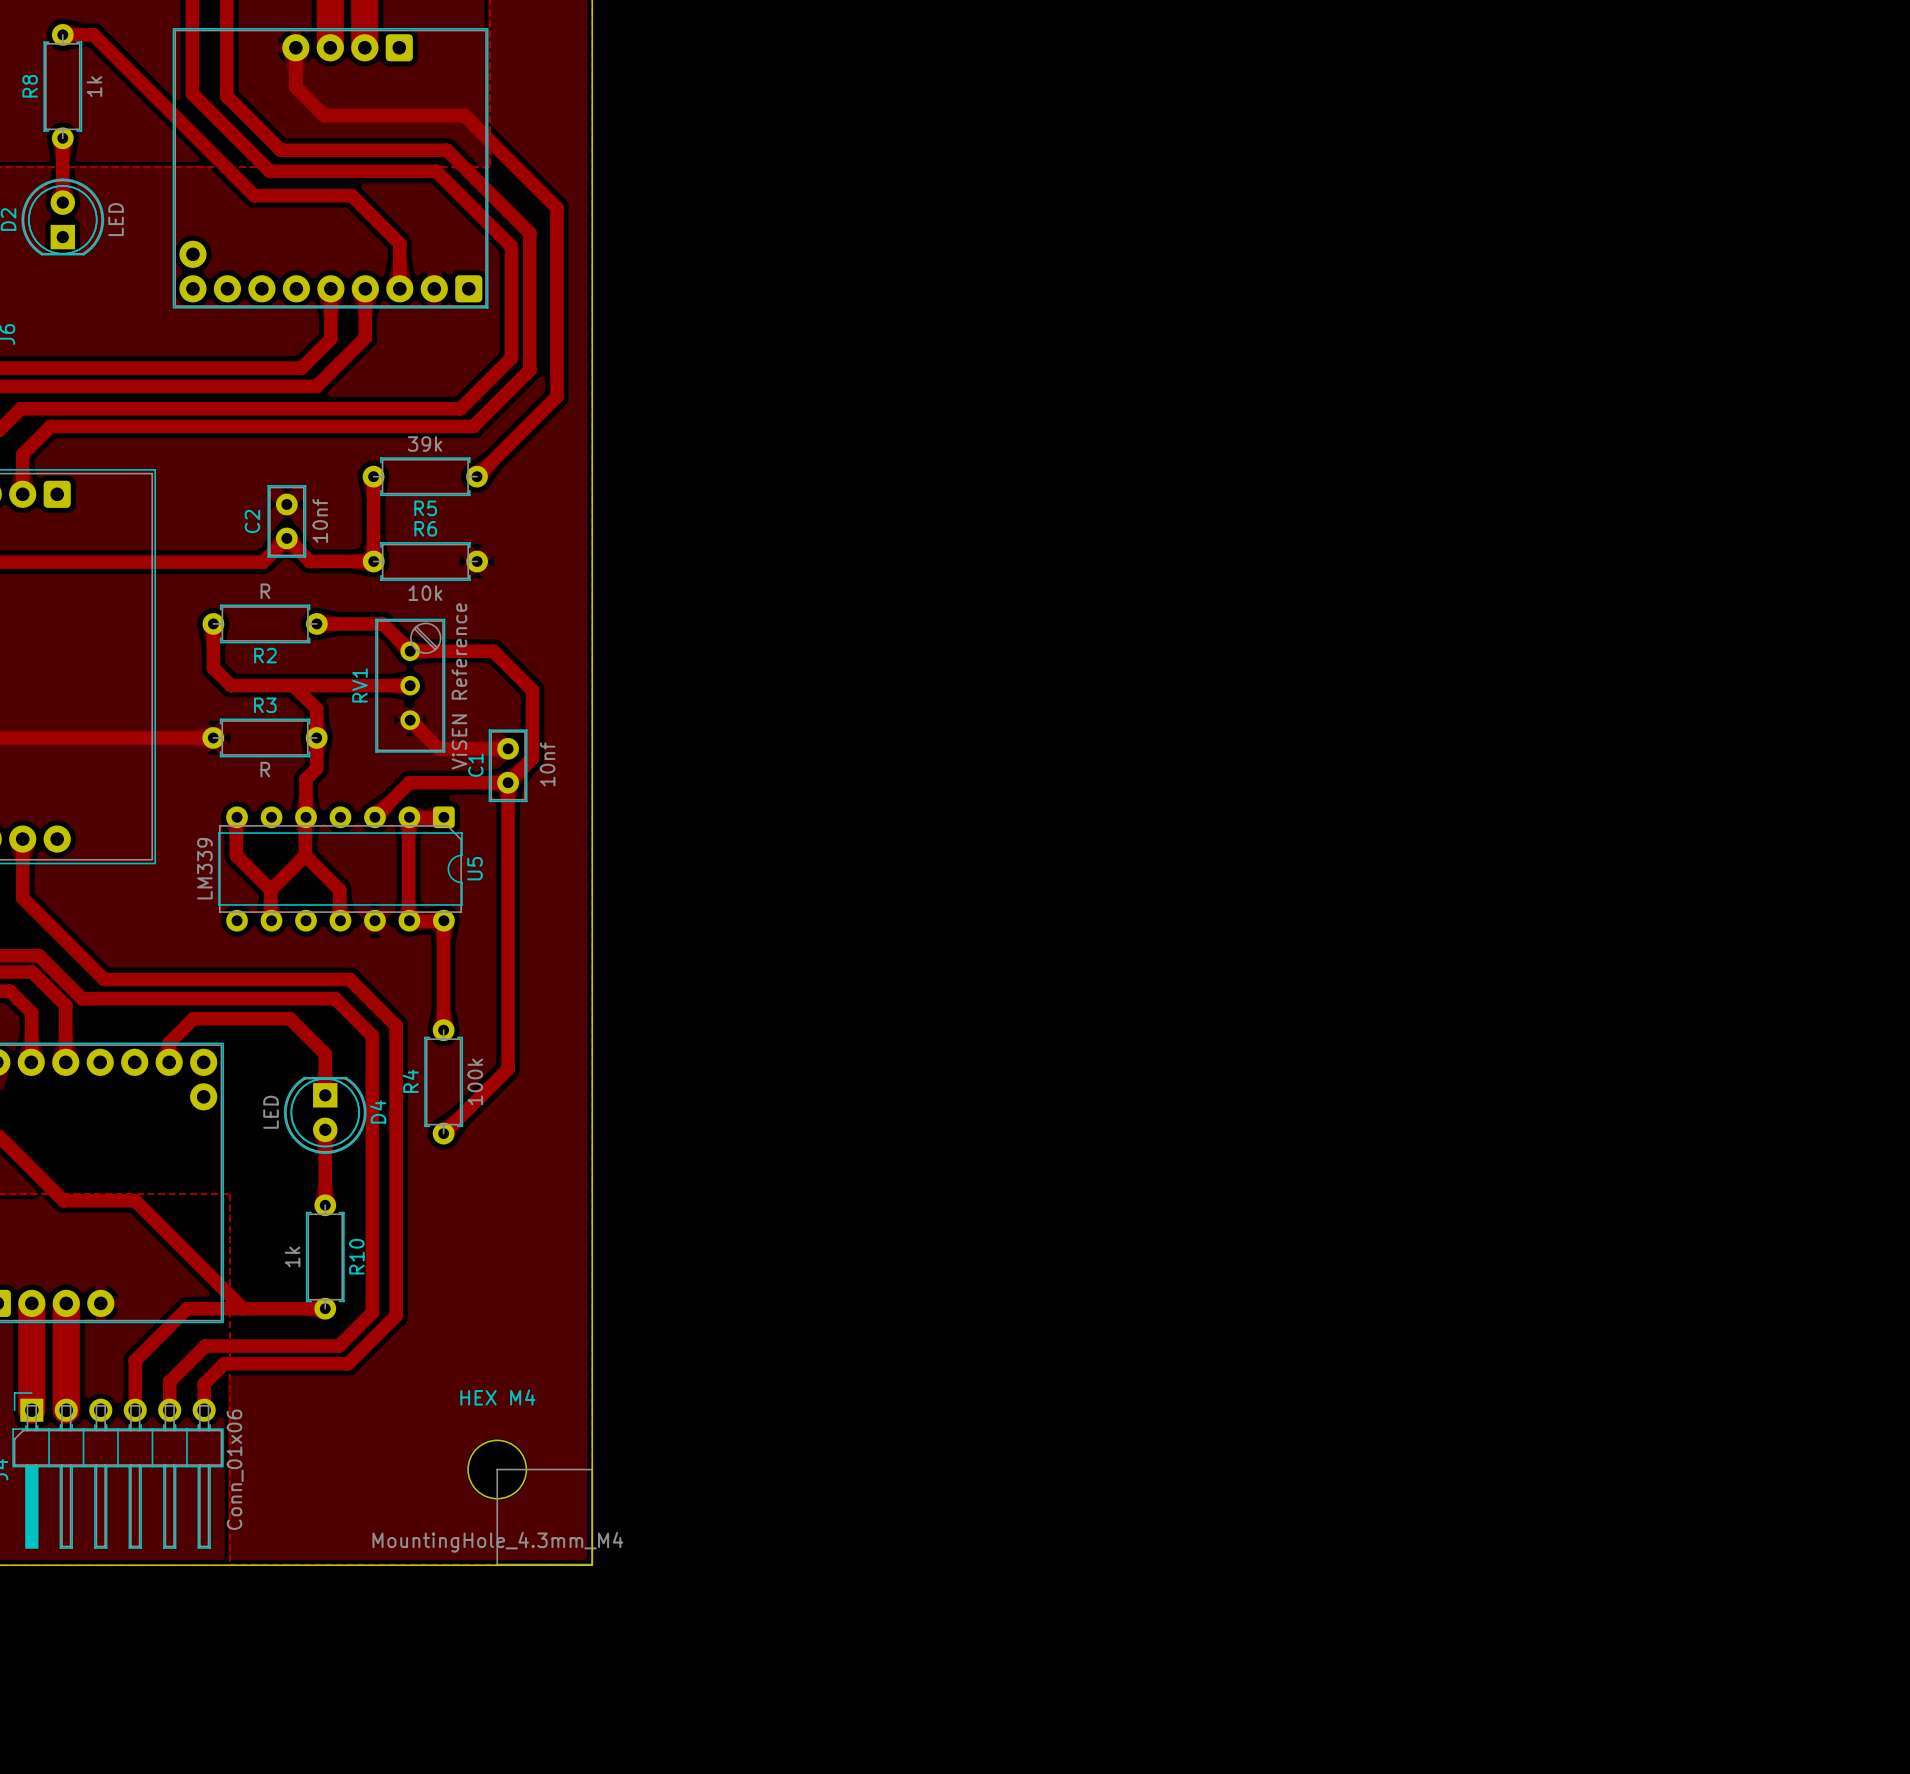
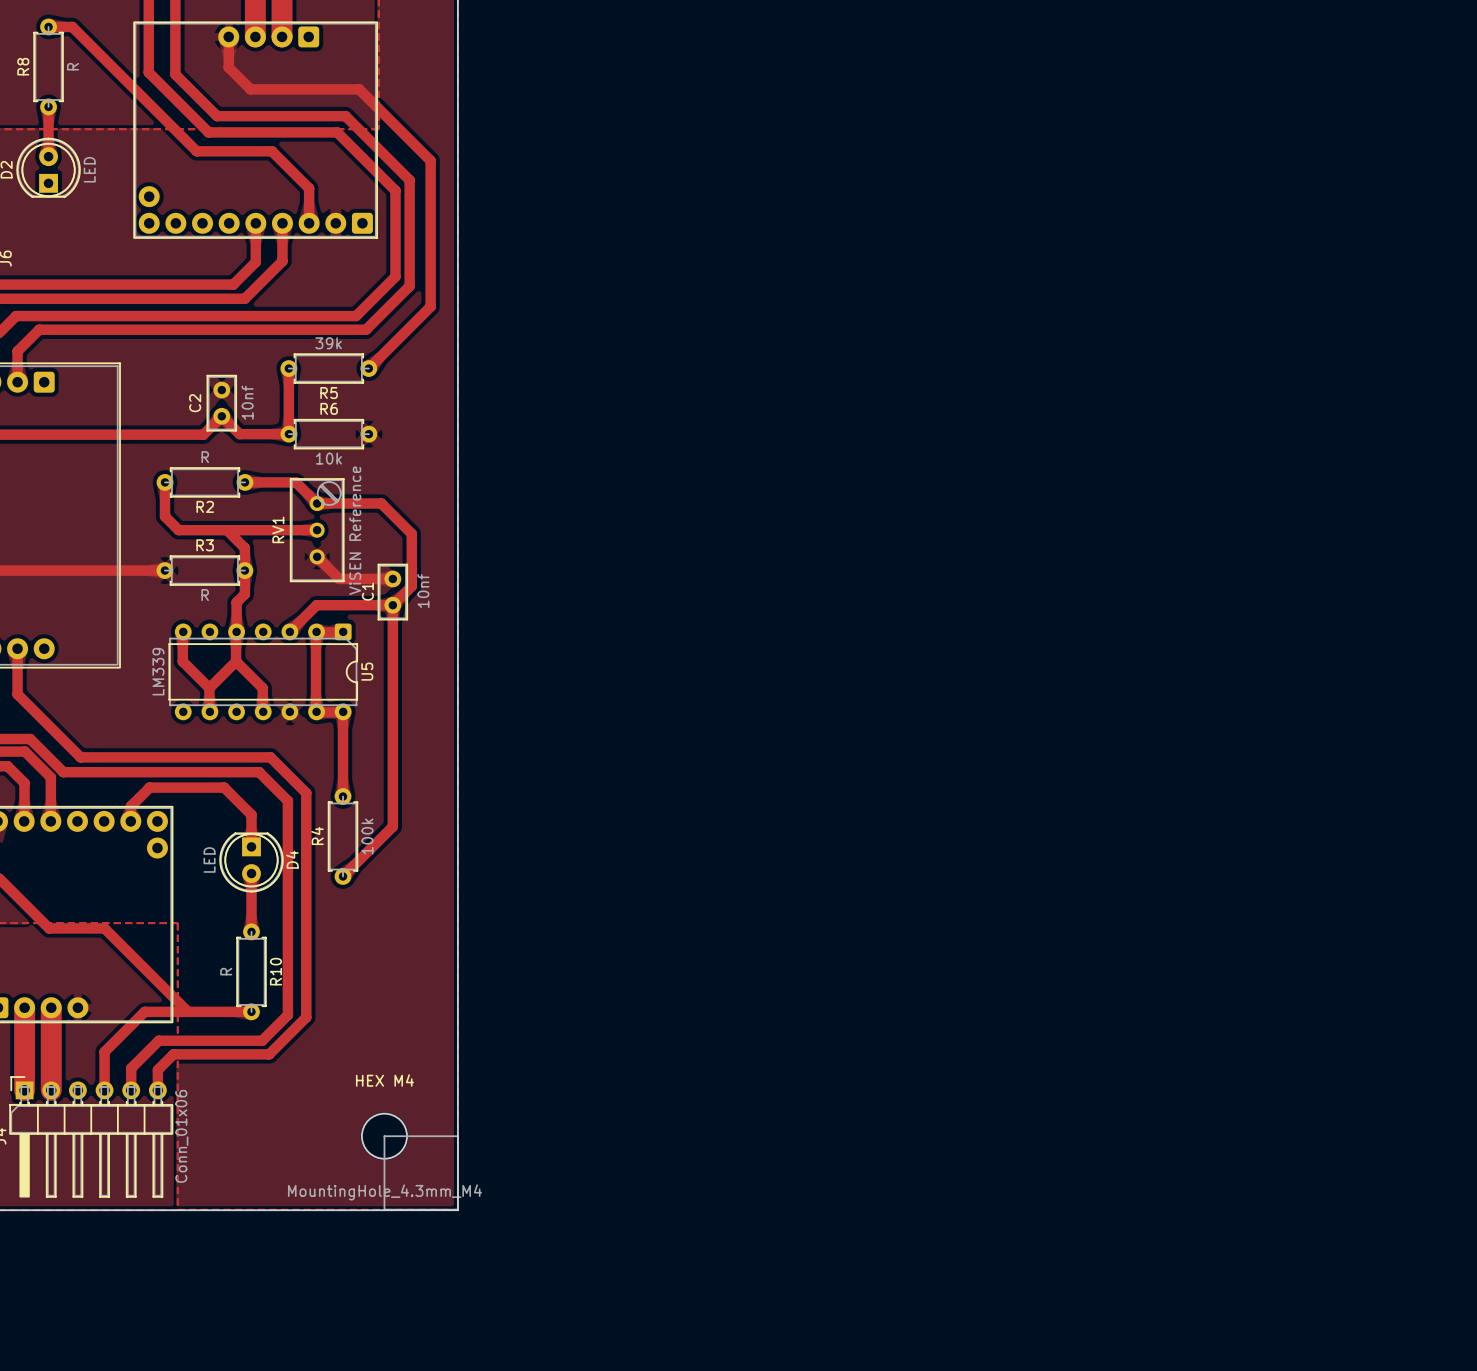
R8 value: 1k (94, 86) -> R (73, 66)
R10 value: 1k (292, 1256) -> R (226, 971)

